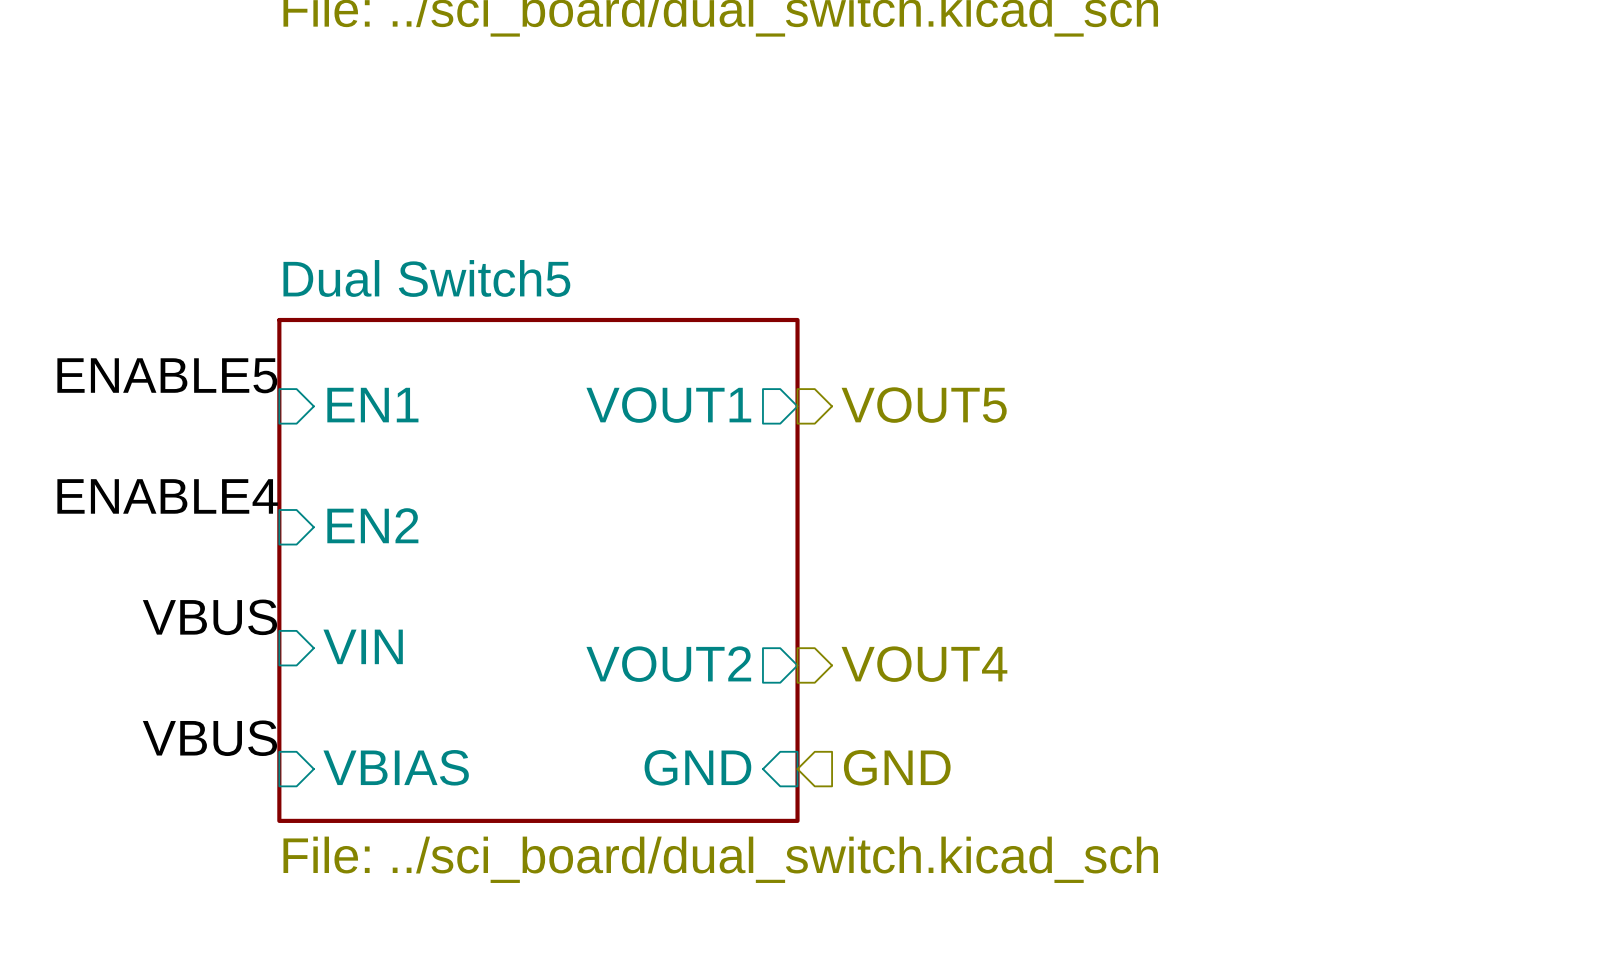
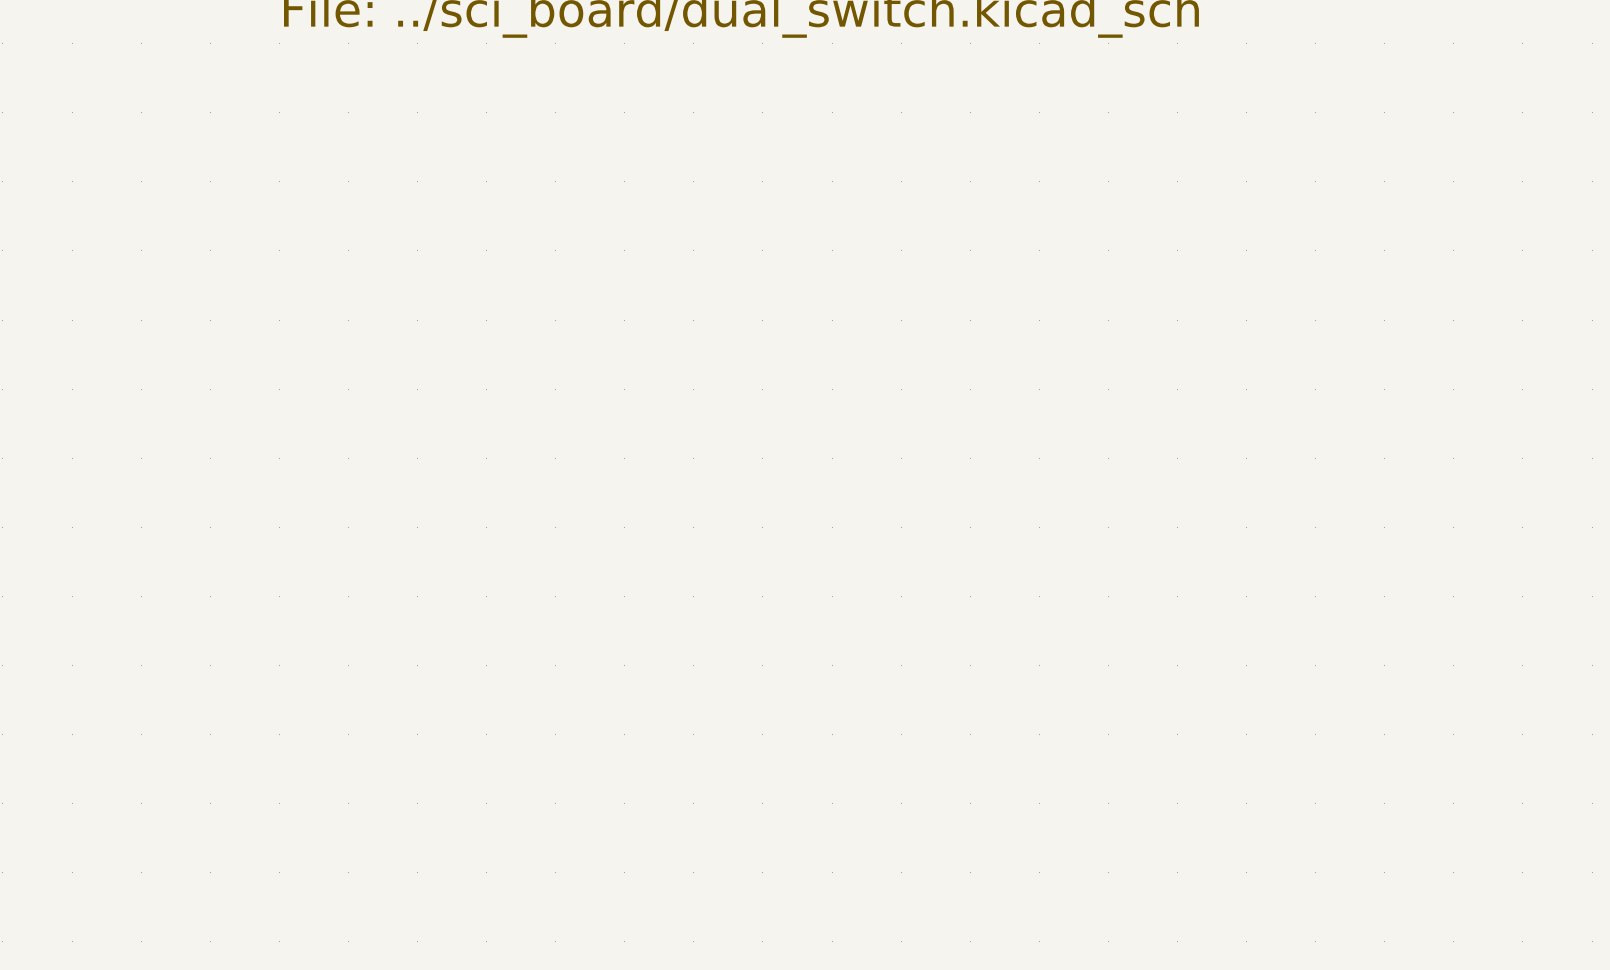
label: ENABLE5 (167, 375) -> none
sheet pin: EN1 (372, 405) -> none
sheet pin: VOUT1 (668, 405) -> none
hierarchical label: VOUT5 (924, 405) -> none
label: ENABLE4 (167, 496) -> none
sheet pin: EN2 (372, 525) -> none
sheet Dual Switch5: File: ../sci_board/dual_switch.kicad_sch (538, 570) -> none
label: VBUS (209, 617) -> none
sheet pin: VIN (363, 646) -> none
sheet pin: VOUT2 (668, 664) -> none
hierarchical label: VOUT4 (924, 664) -> none
label: VBUS (209, 738) -> none
sheet pin: VBIAS (396, 767) -> none
sheet pin: GND (697, 767) -> none
hierarchical label: GND (897, 767) -> none

